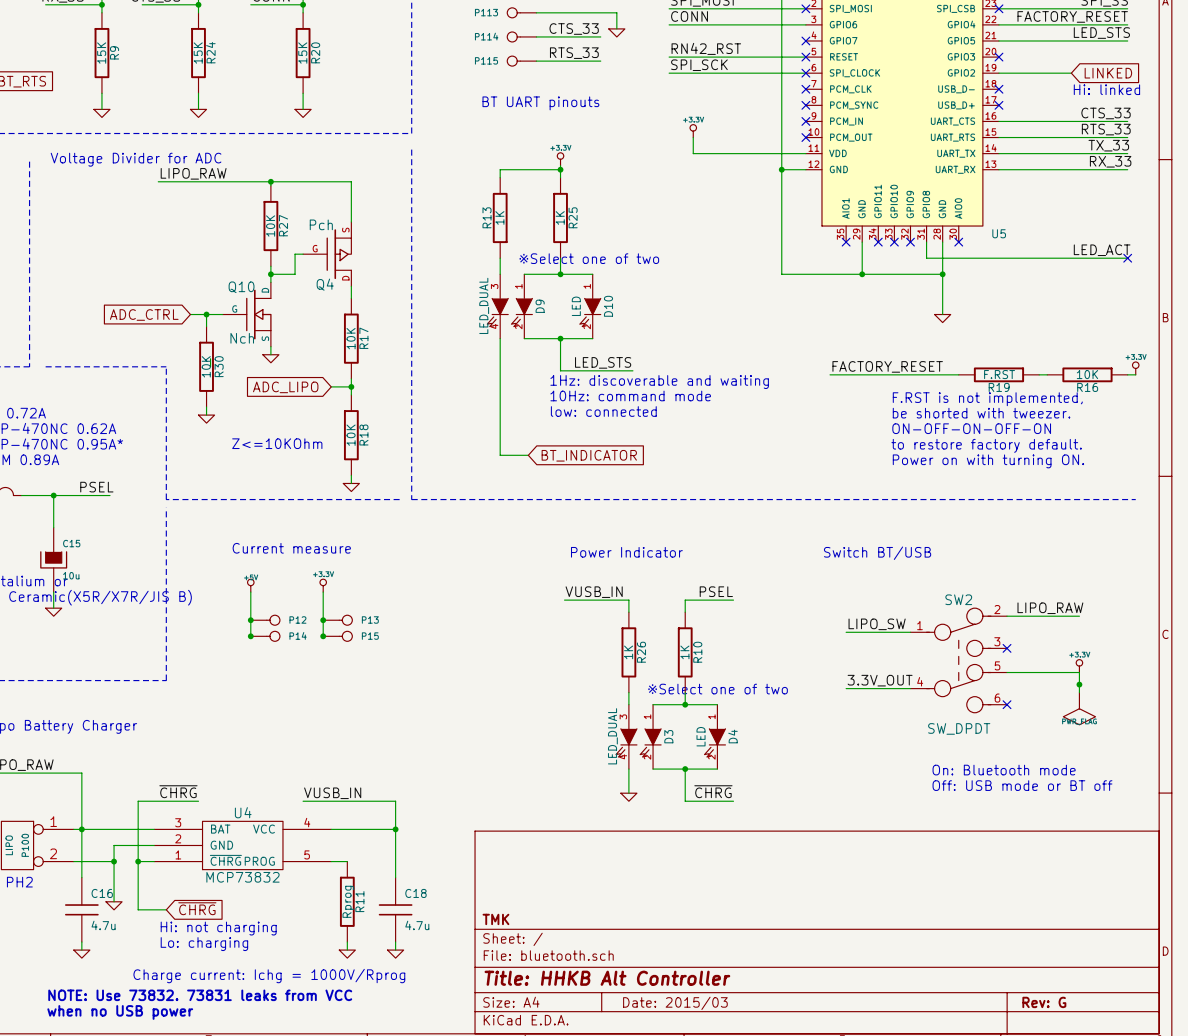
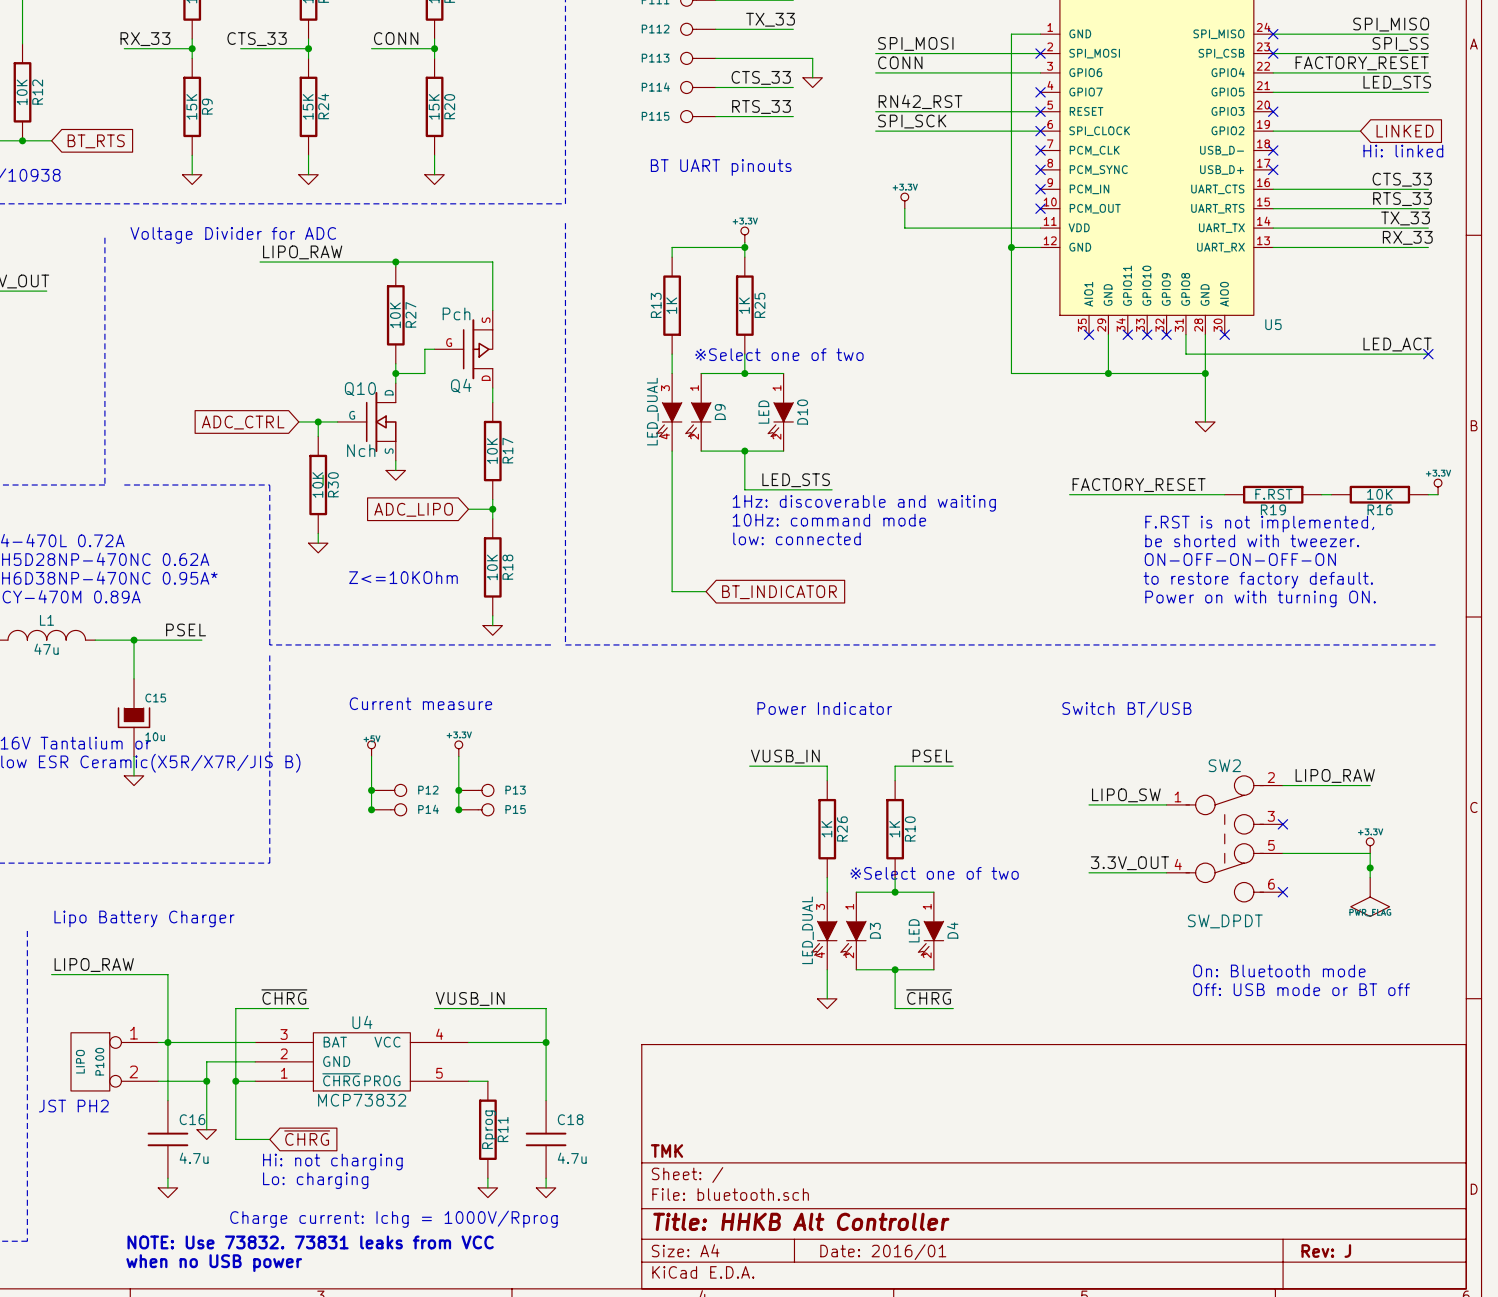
title block: Rev: G (1044, 1002) -> Rev: J (1326, 1251)
title block: Date: 2015/03 (675, 1003) -> Date: 2016/01 (883, 1252)

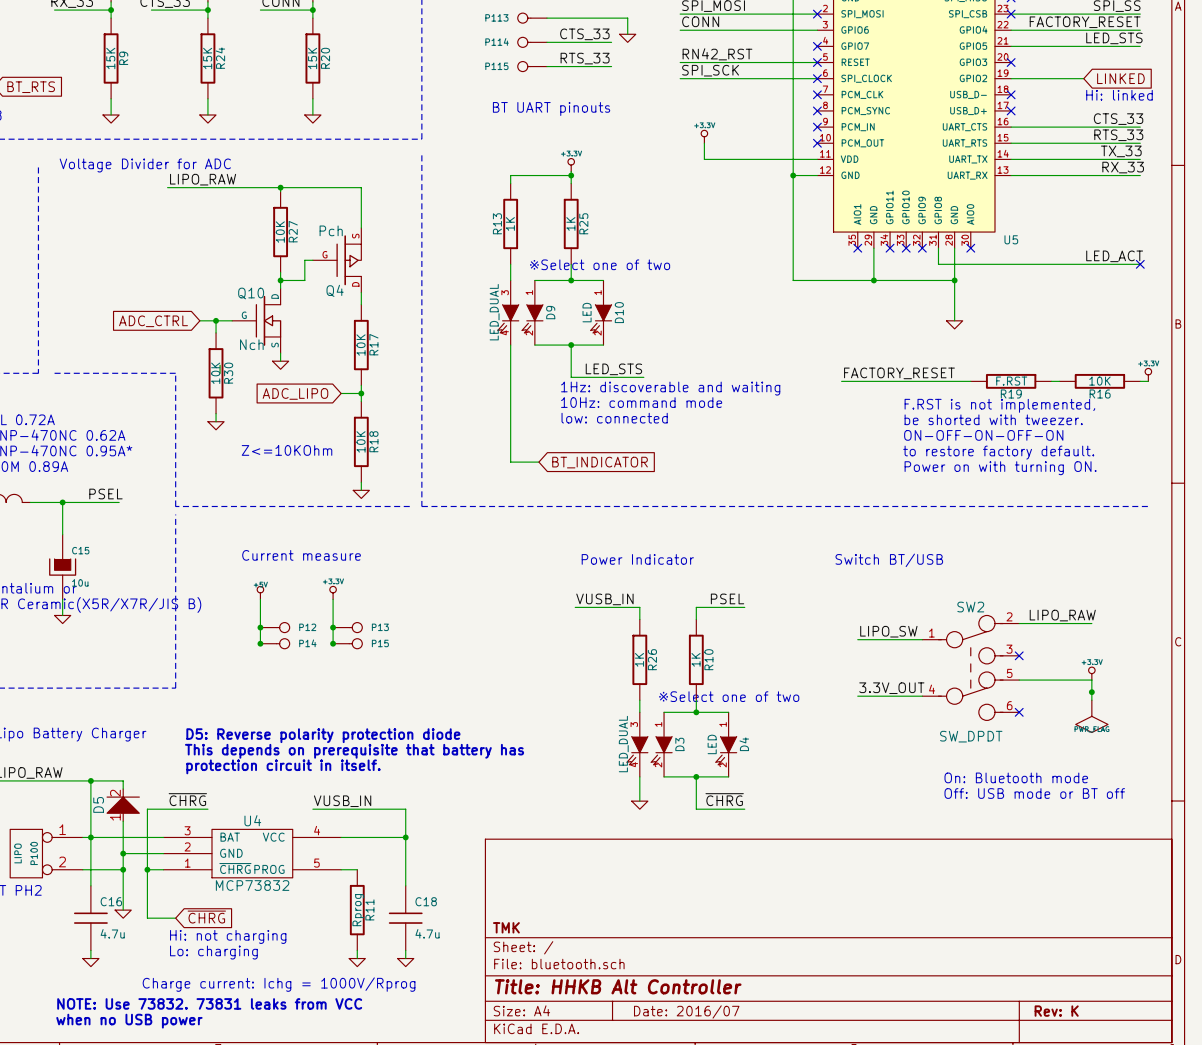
text: none -> D5: Reverse polarity protection diode (323, 735)
text: none -> This depends on prerequisite that battery has (354, 751)
text: none -> protection circuit in itself. (283, 766)
wire: none -> (90, 780) (123, 780) (123, 789)
junction: none -> (90, 780)
D5: none -> (123, 805)
wire: none -> (123, 821) (123, 853)
junction: none -> (123, 853)
title block: Rev: J (1326, 1251) -> Rev: K (1056, 1011)
title block: Date: 2016/01 (883, 1252) -> Date: 2016/07 (686, 1011)

